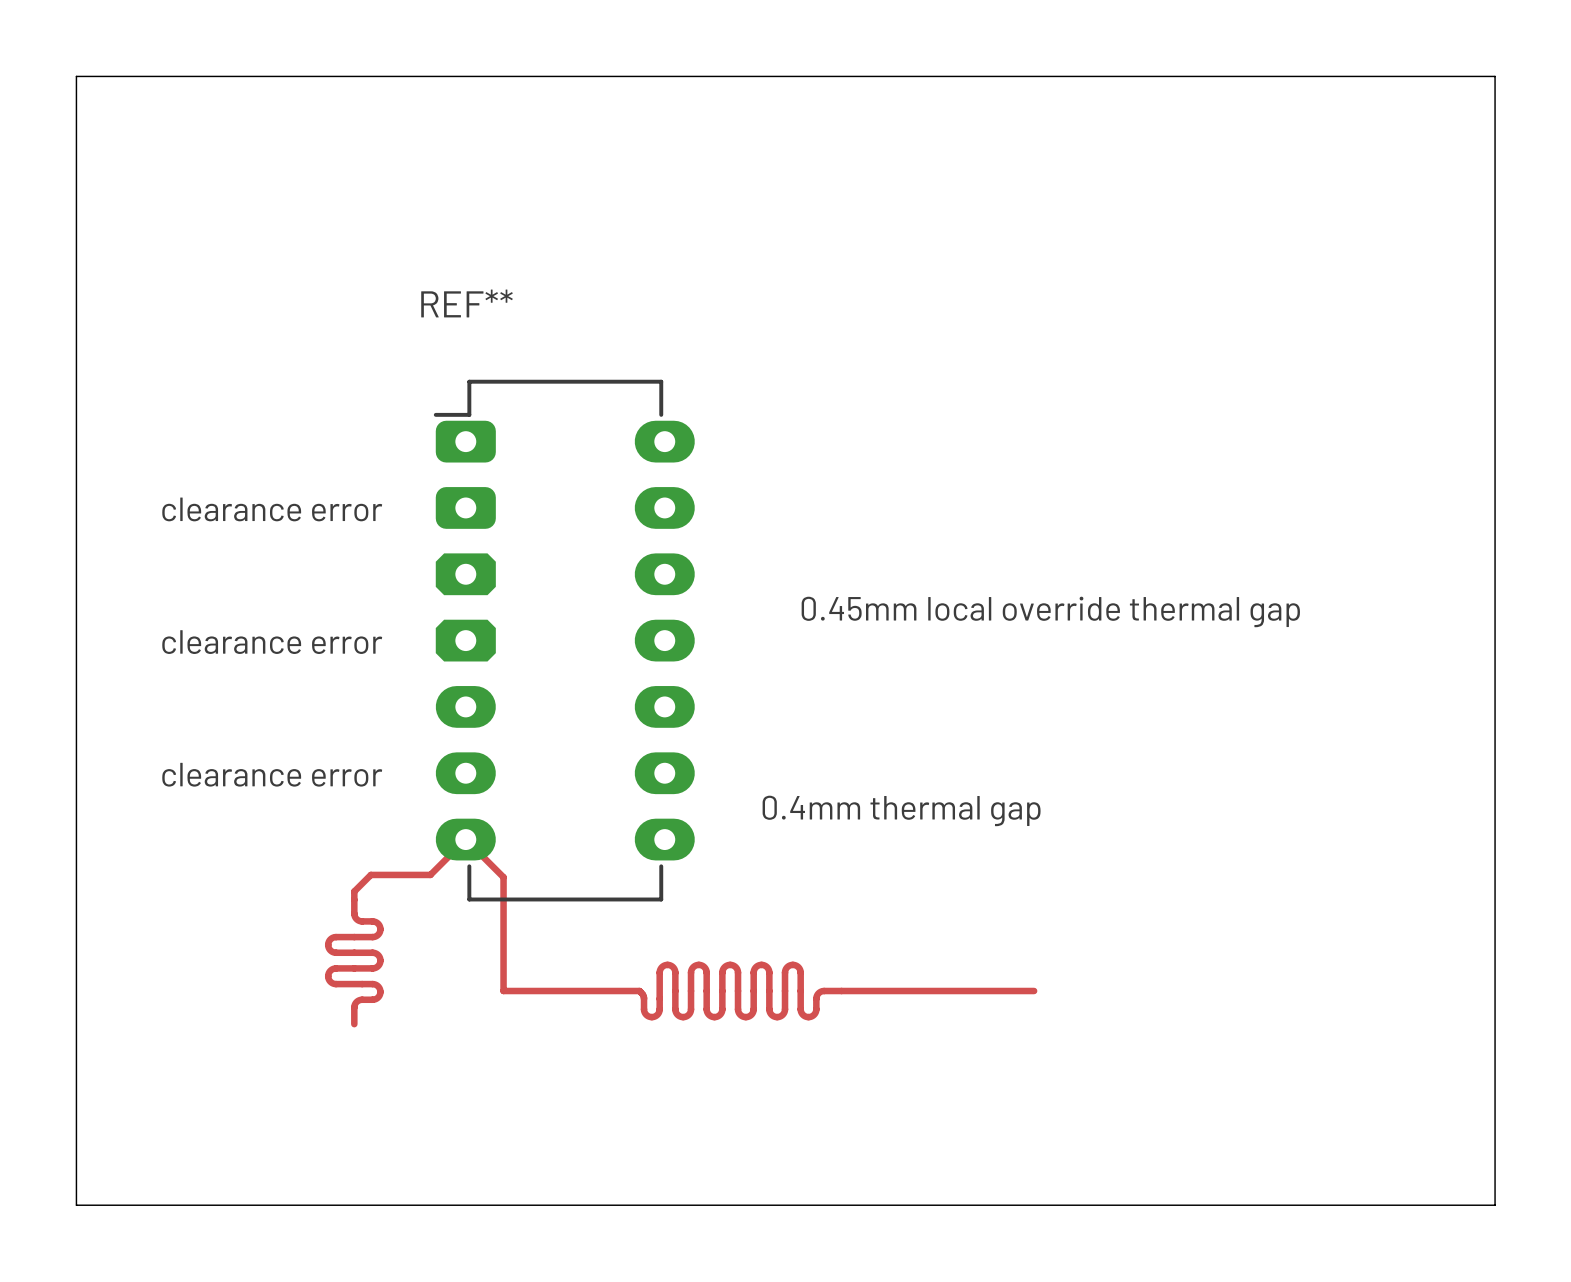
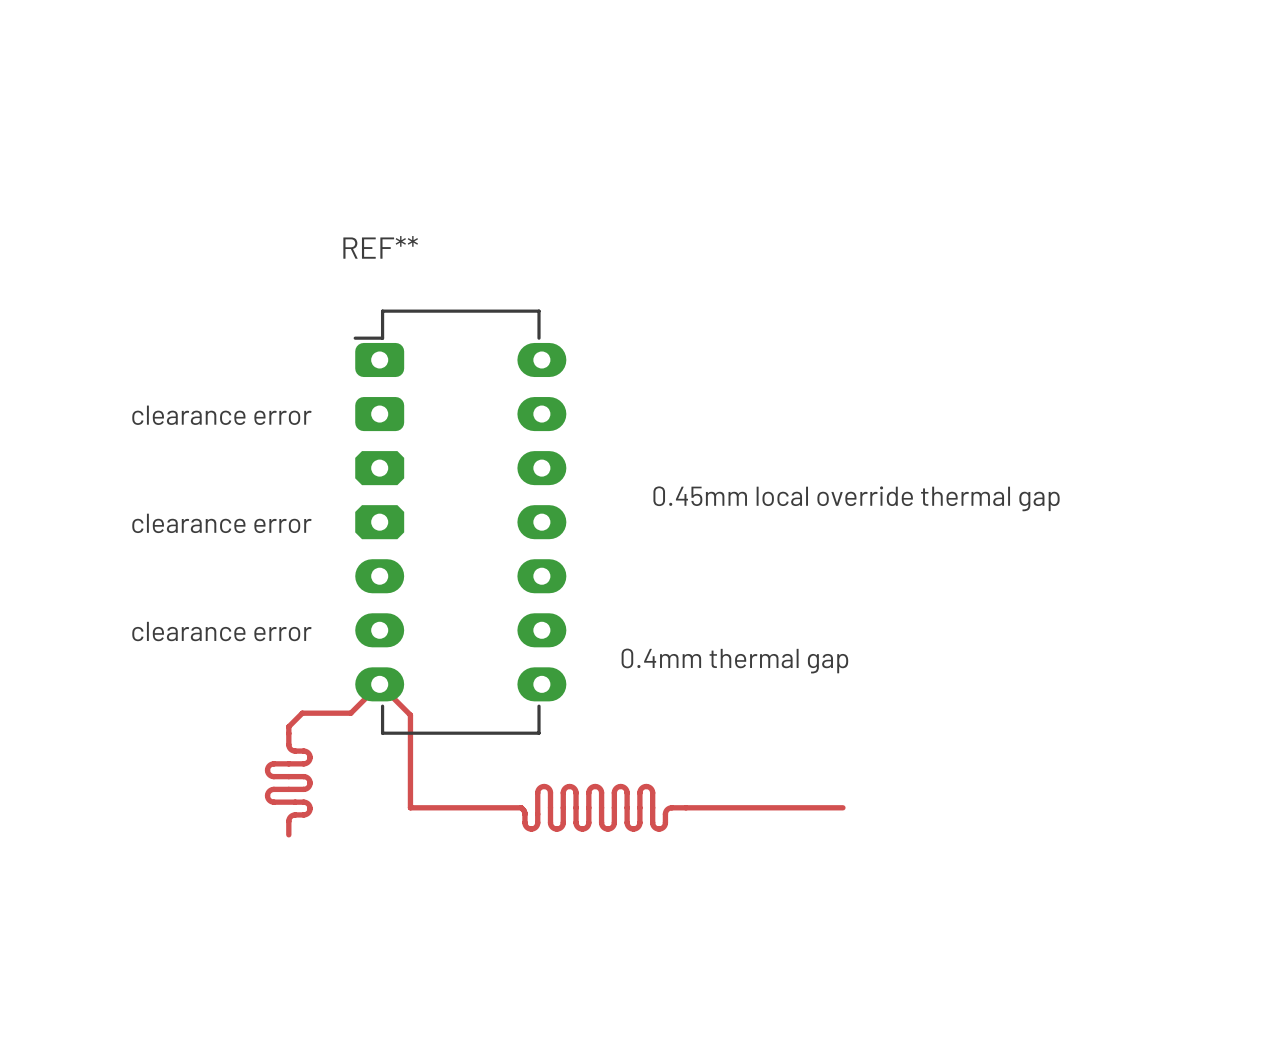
board edge: (76, 76) (1495, 76) (1495, 1205) (76, 1205) (76, 76) -> none

